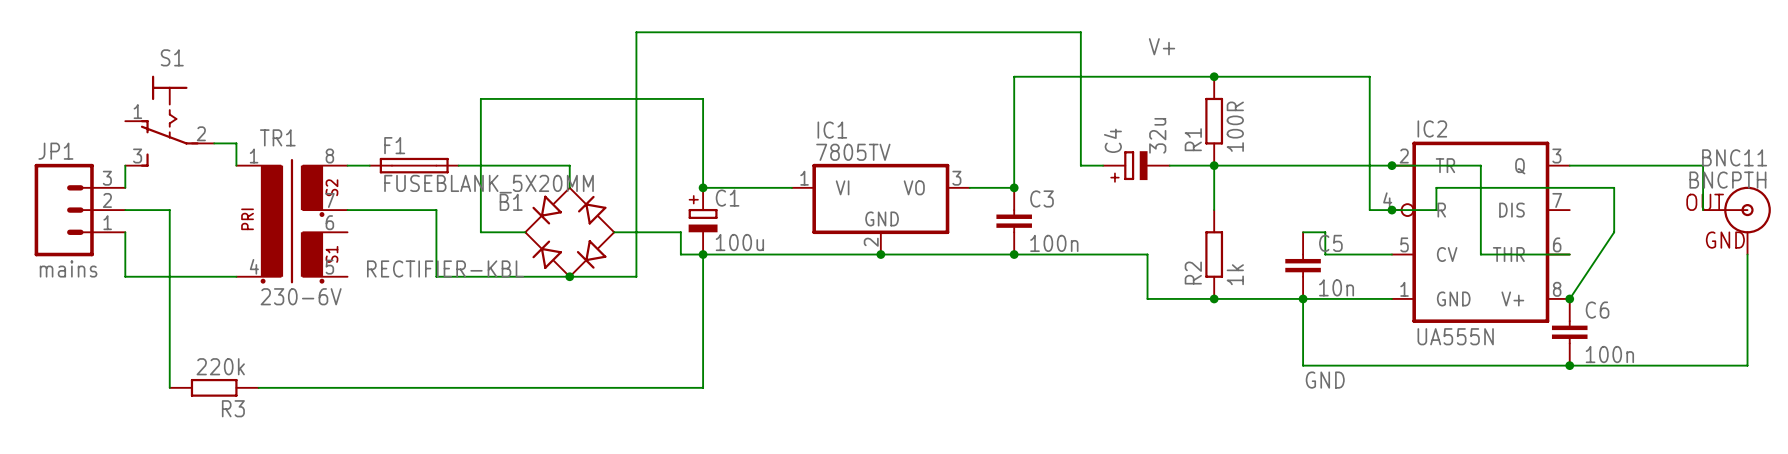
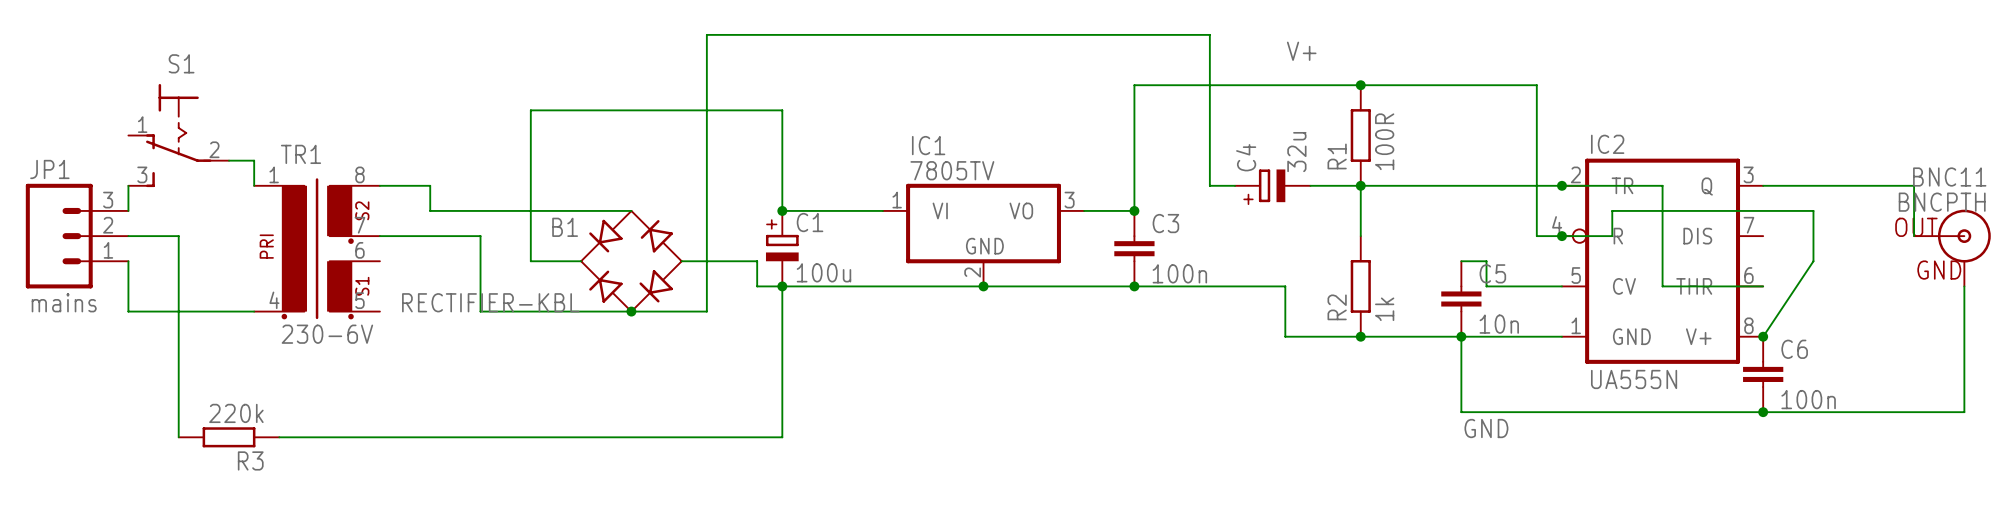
F1: FUSEBLANK_5X20MM (414, 165) -> none
wire: (458, 165) (569, 165) (569, 187) -> (405, 185) (430, 185) (430, 210) (631, 210)

